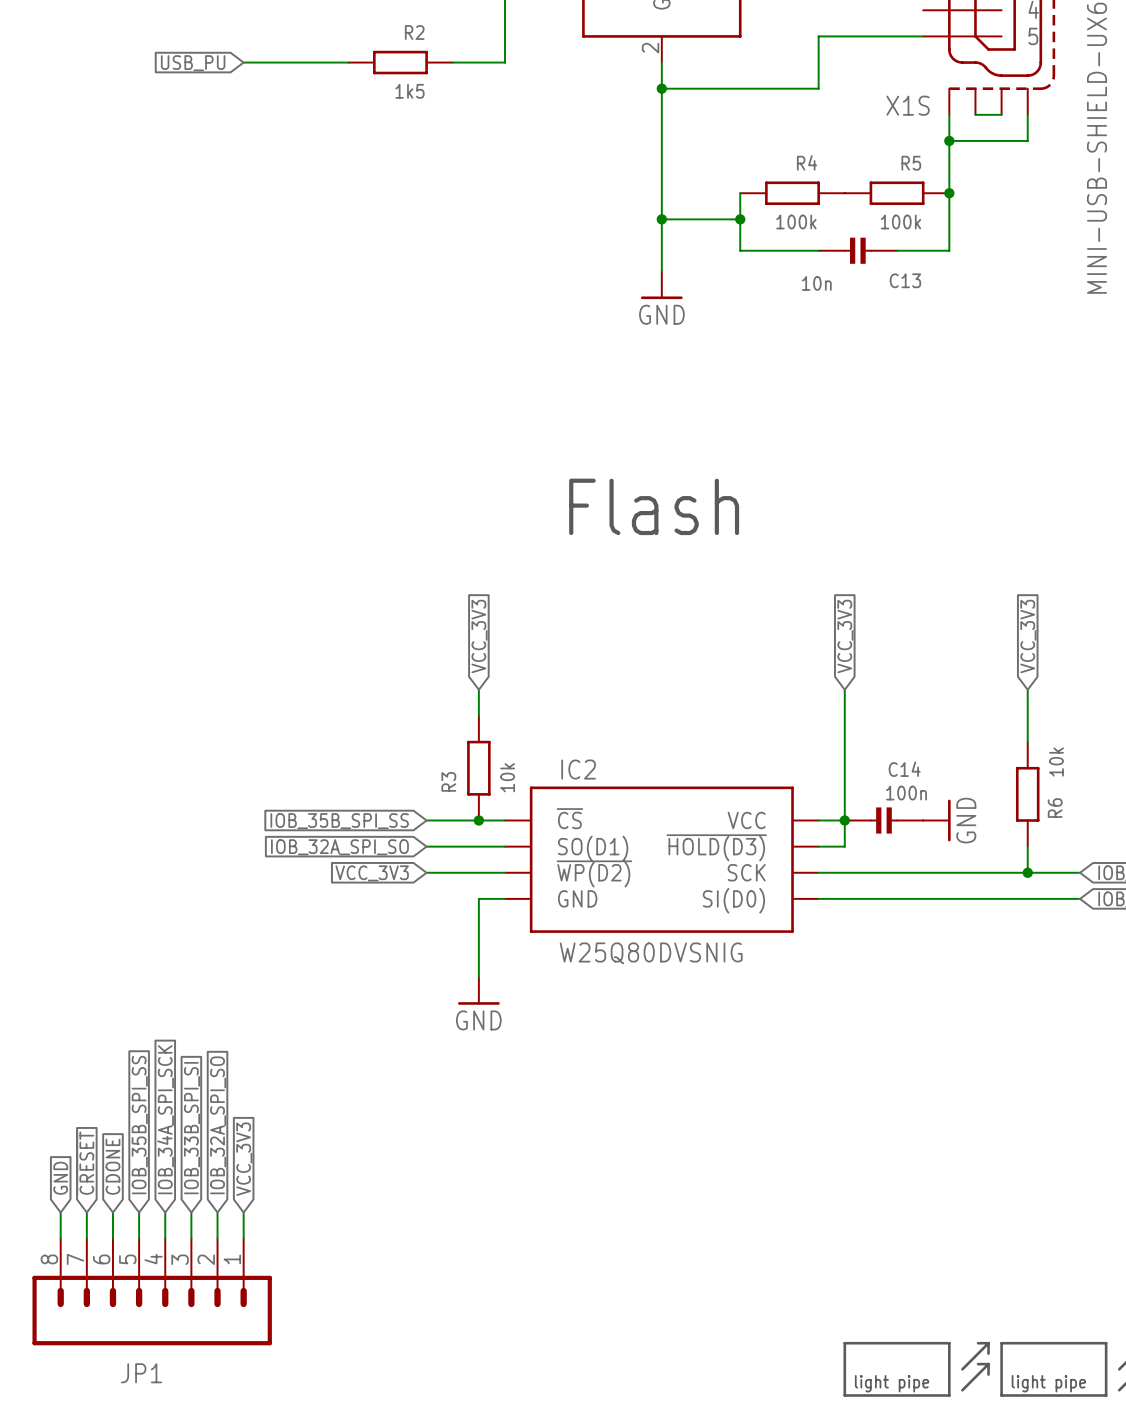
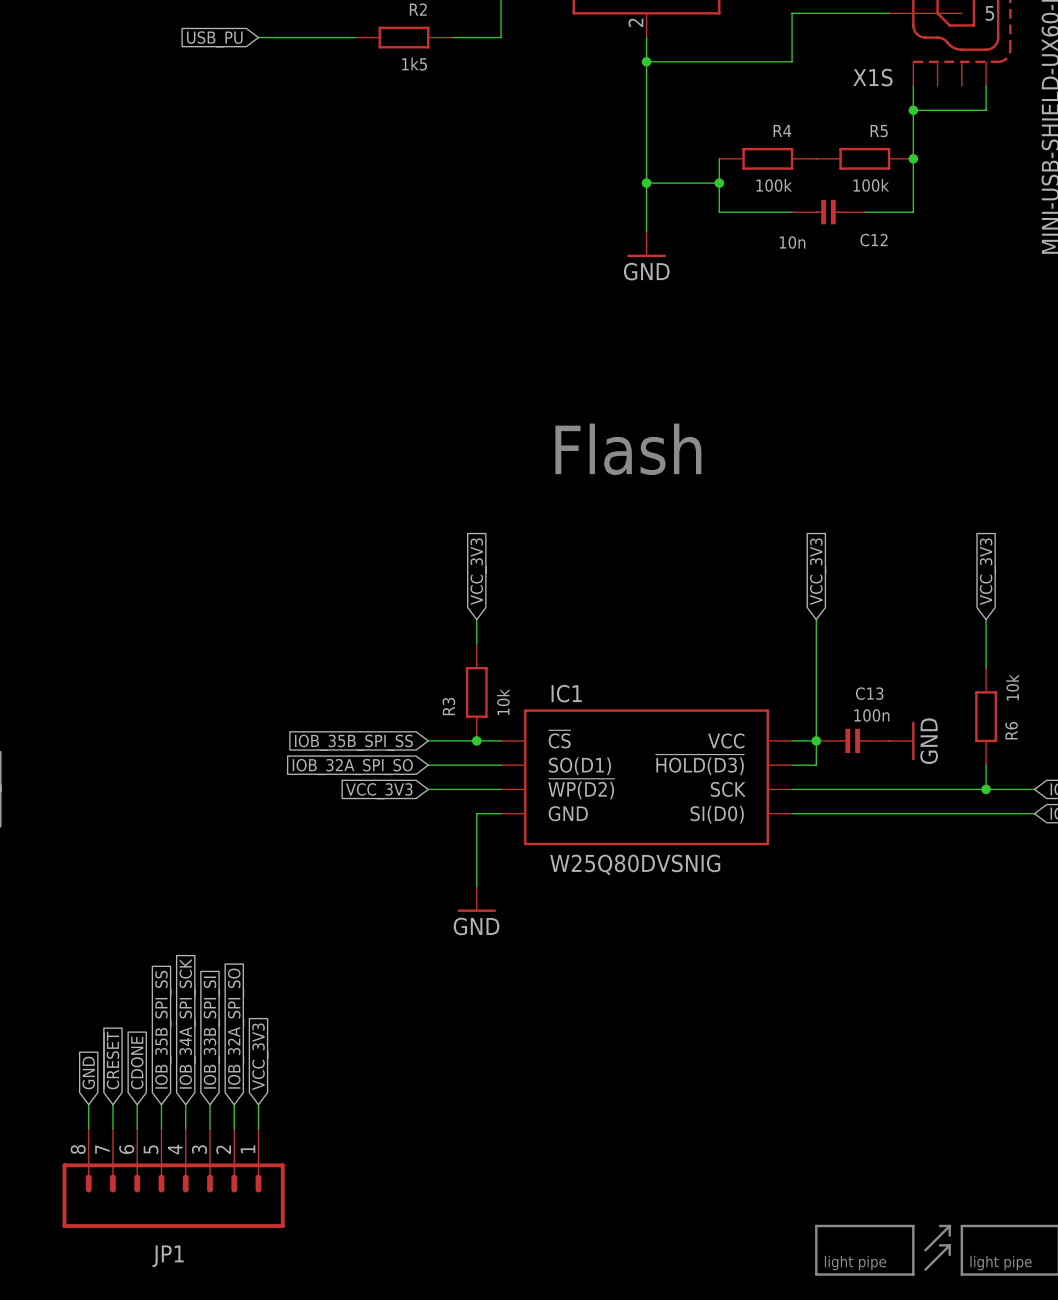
wire: (975, 114) (1001, 114) -> none
C13 name: C13 (905, 280) -> C12 (873, 240)
IC2 name: IC2 (578, 769) -> IC1 (566, 693)
C14 name: C14 (904, 769) -> C13 (869, 693)

